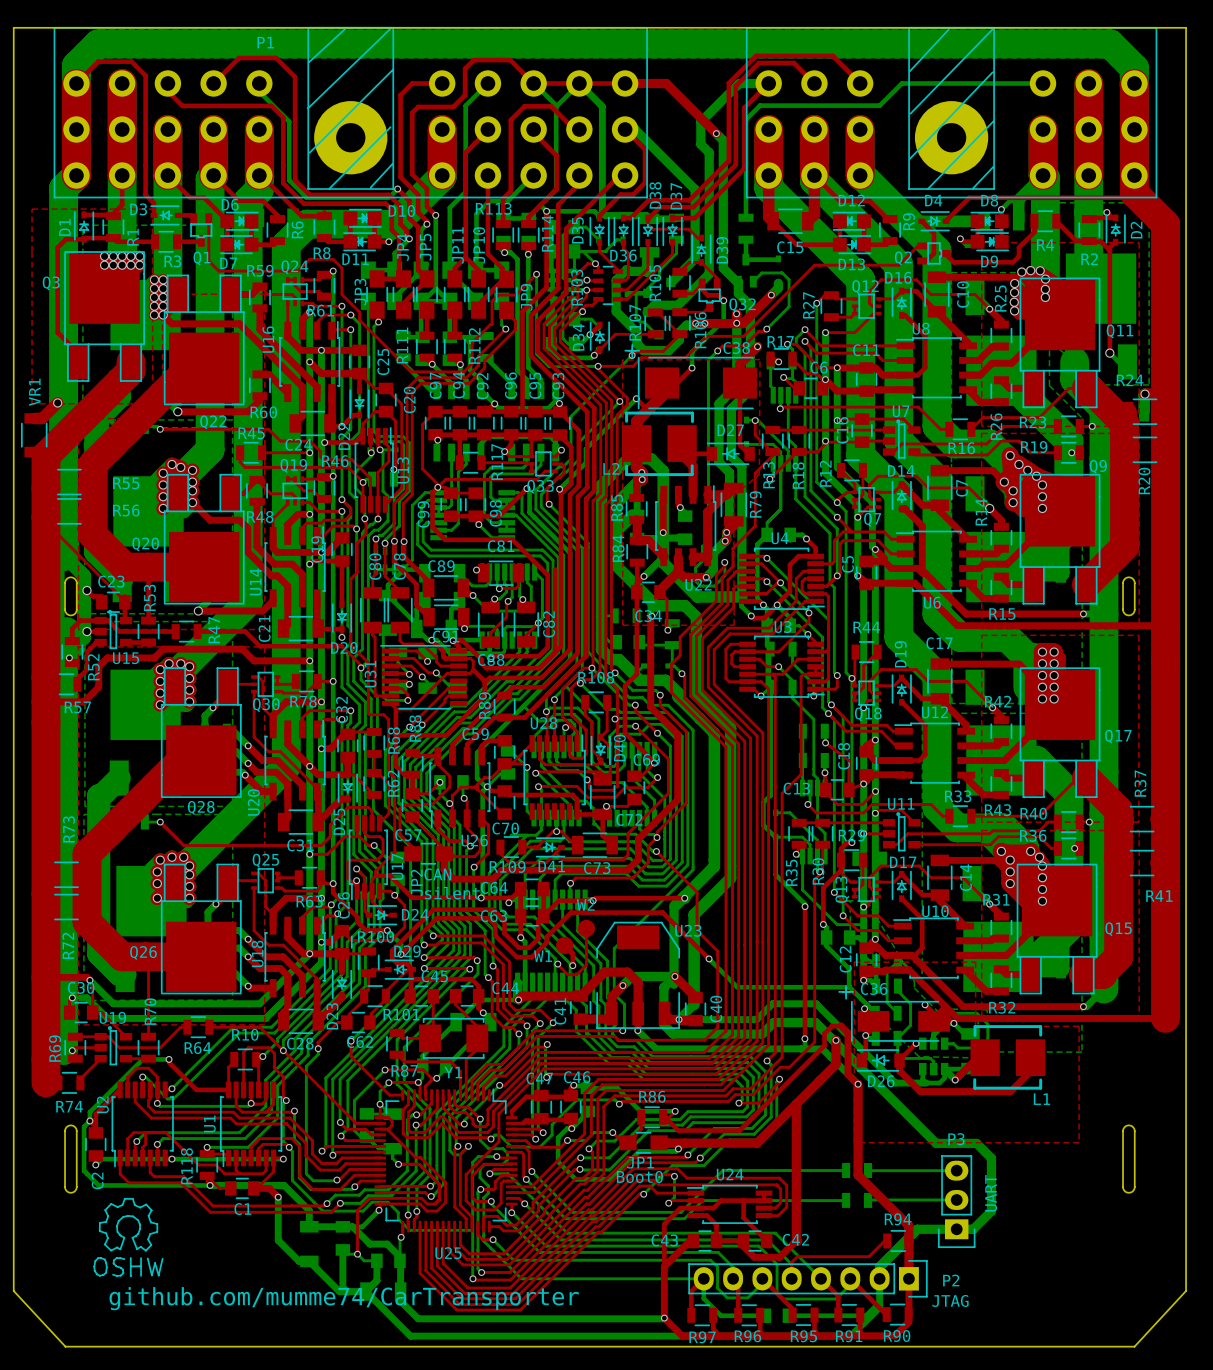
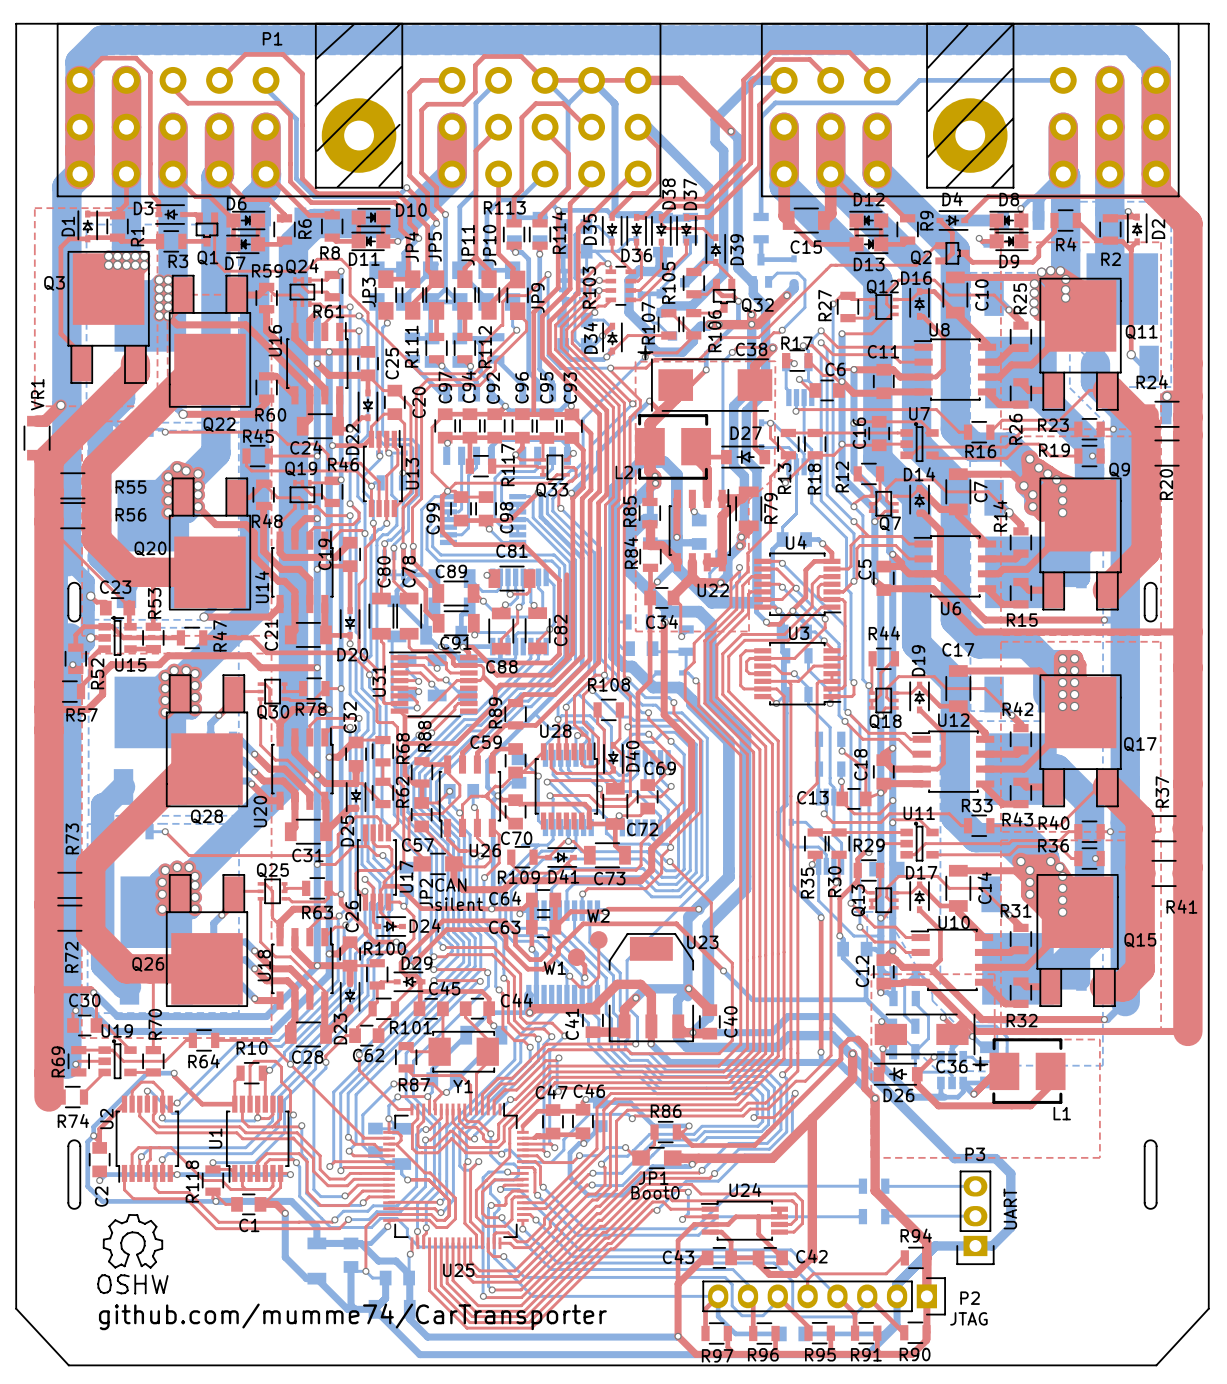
C36 rotation: 0° (894, 1013) -> 180° (931, 1042)

